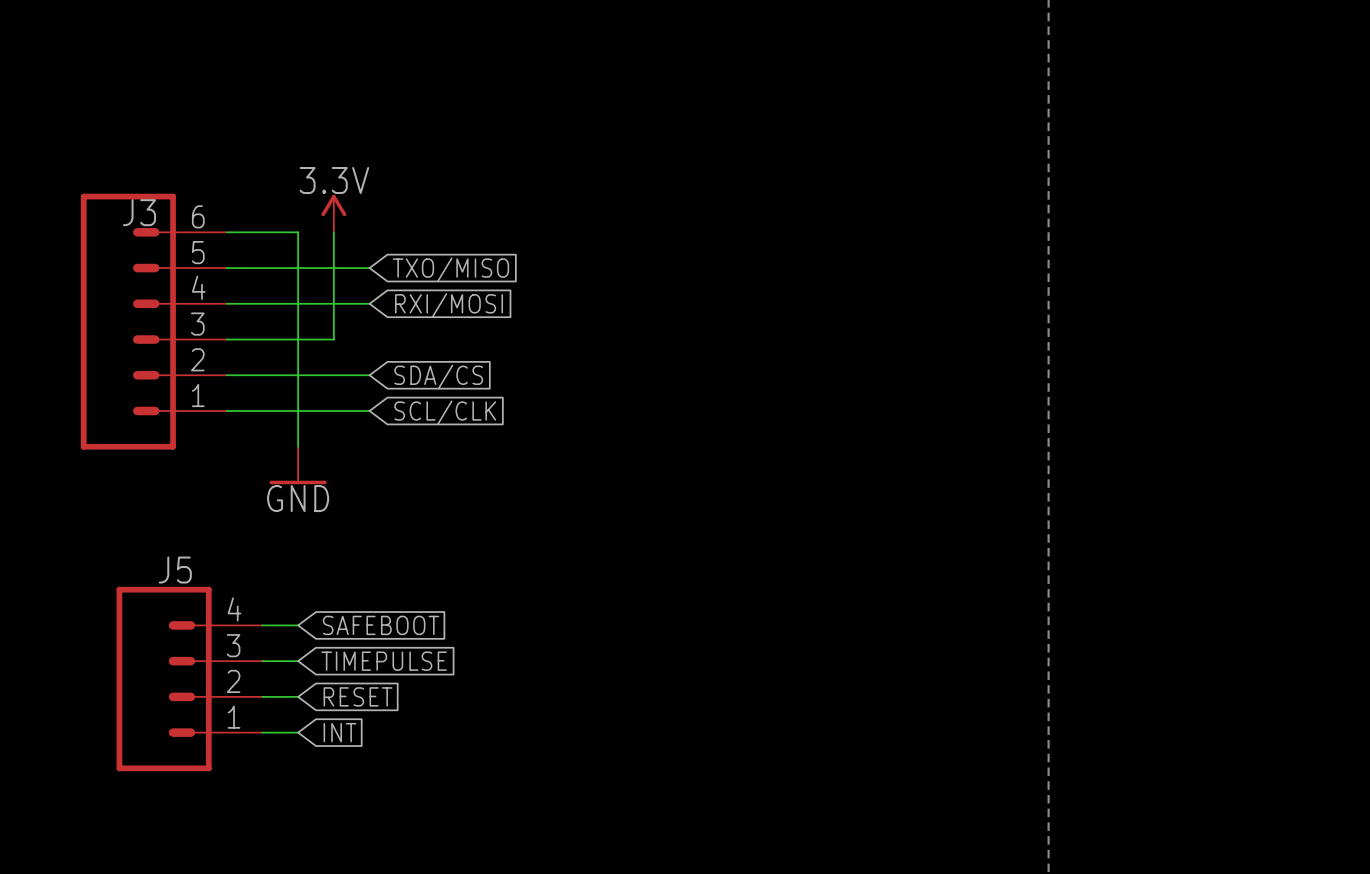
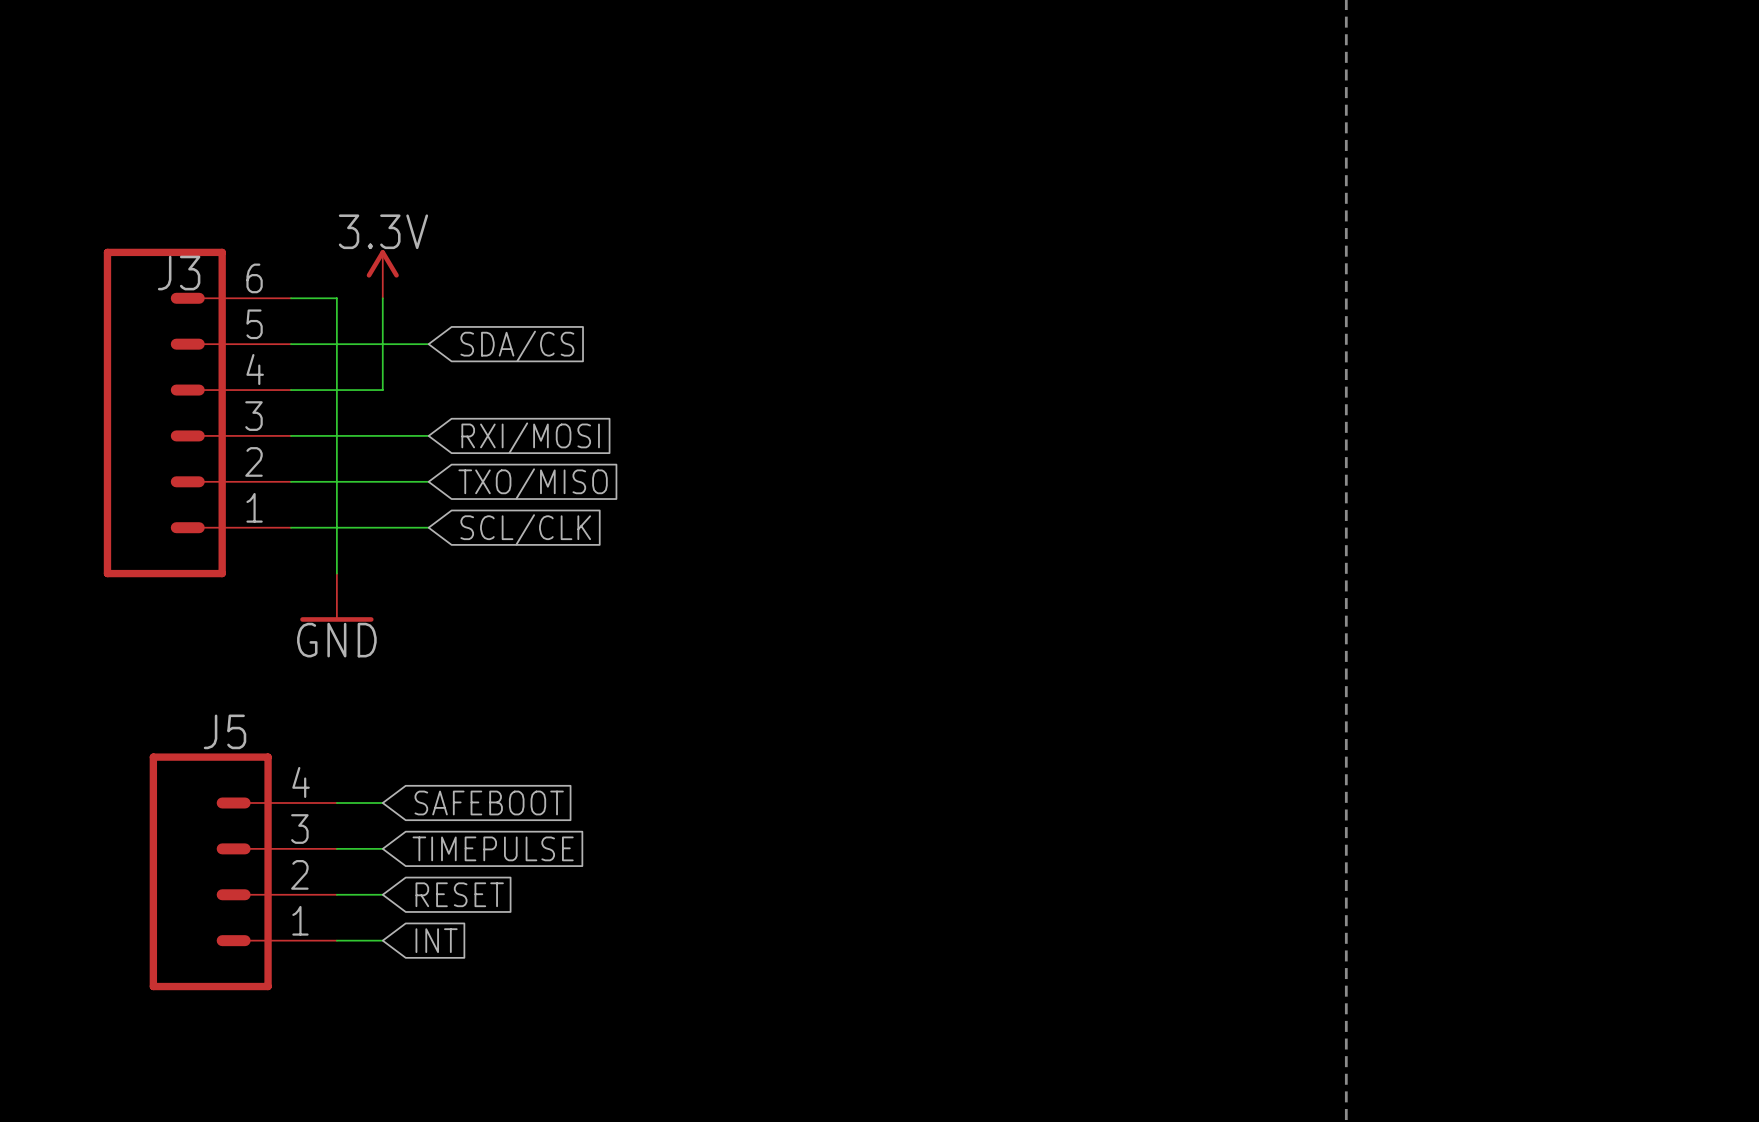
power symbol position: 3.3V (333, 213) -> 3.3V (382, 274)
wire: (262, 232) (298, 232) -> (336, 298) (336, 573)
wire: (333, 232) (333, 339) -> none
wire: (333, 268) (369, 268) -> none
global label position: TXO/MISO (450, 269) -> TXO/MISO (533, 484)
wire: (369, 303) (298, 303) (298, 446) -> none
global label position: RXI/MOSI (449, 305) -> RXI/MOSI (530, 438)
wire: (333, 375) (369, 375) -> none
global label position: SDA/CS (438, 376) -> SDA/CS (517, 346)
wire: (333, 411) (369, 411) -> none
global label position: SCL/CLK (445, 412) -> SCL/CLK (525, 529)
power symbol position: GND (298, 465) -> GND (336, 597)

